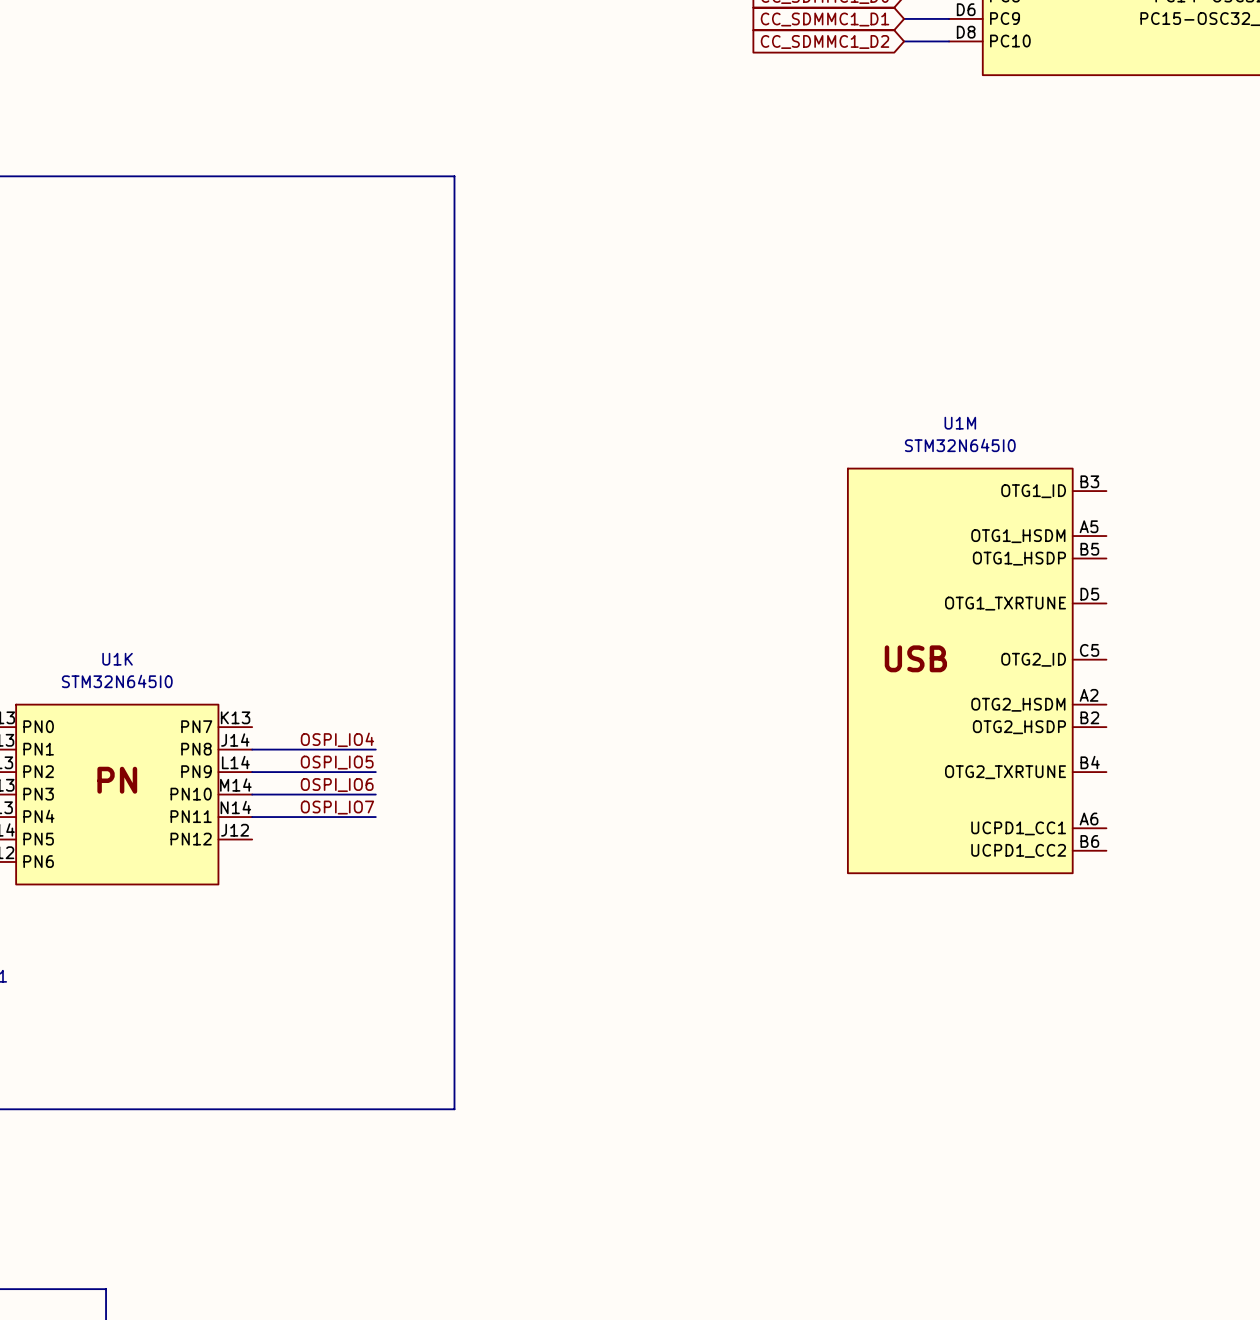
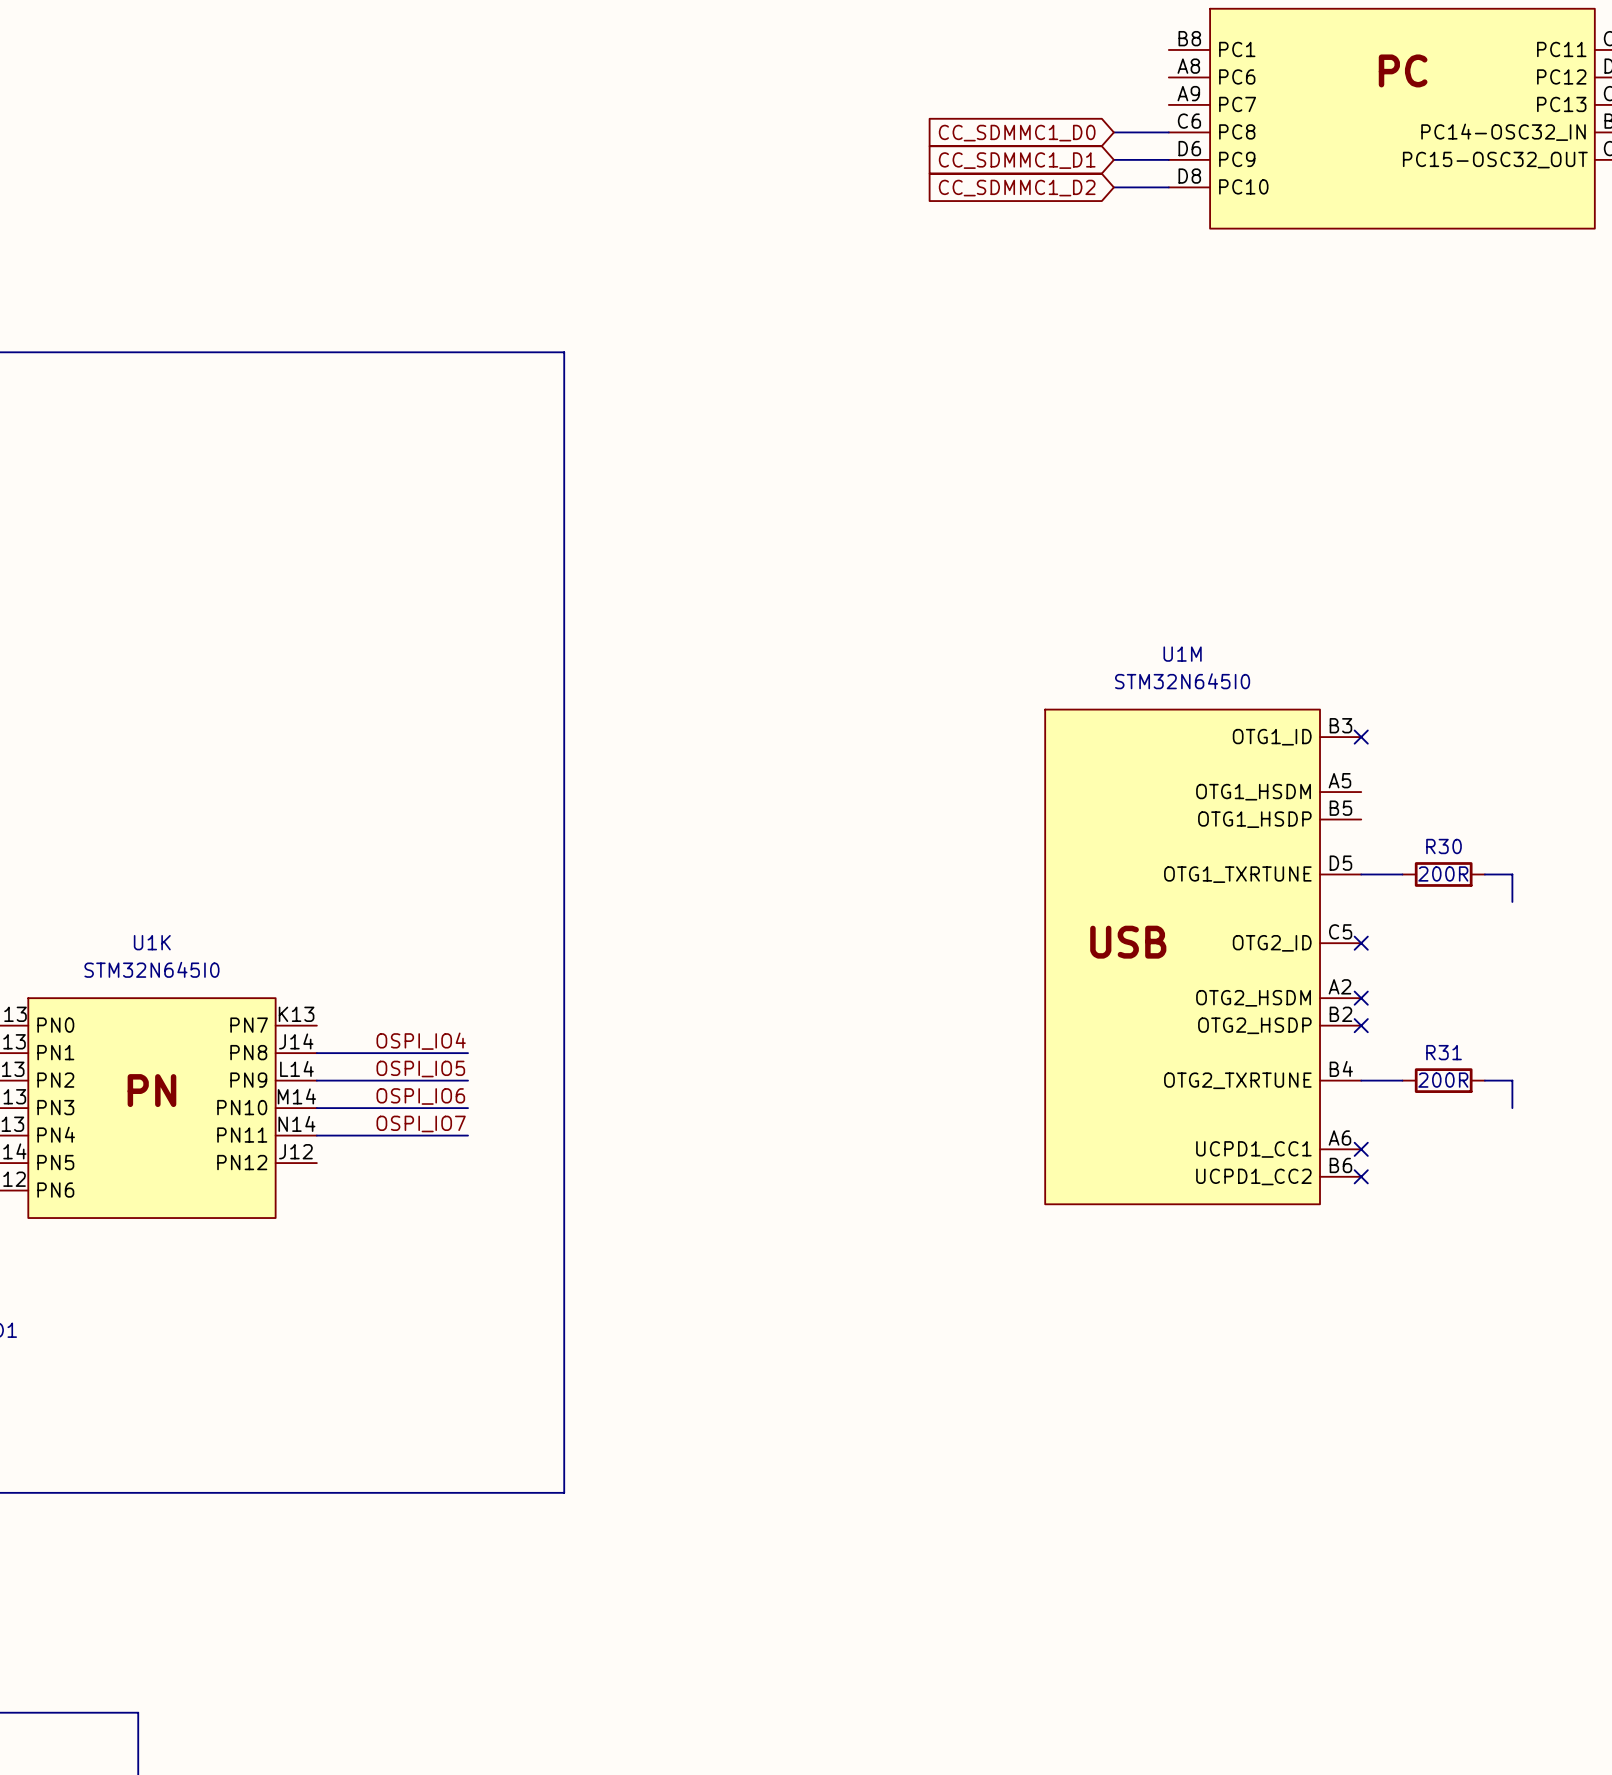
no-connect mark: none -> (1361, 737)
wire: none -> (1361, 874) (1402, 874)
R30: none -> 200R (1443, 874)
wire: none -> (1484, 874) (1512, 874) (1512, 901)
no-connect mark: none -> (1361, 943)
no-connect mark: none -> (1361, 998)
no-connect mark: none -> (1361, 1025)
wire: none -> (1361, 1080) (1402, 1080)
R31: none -> 200R (1443, 1080)
wire: none -> (1484, 1080) (1512, 1080) (1512, 1108)
no-connect mark: none -> (1361, 1149)
no-connect mark: none -> (1361, 1176)

